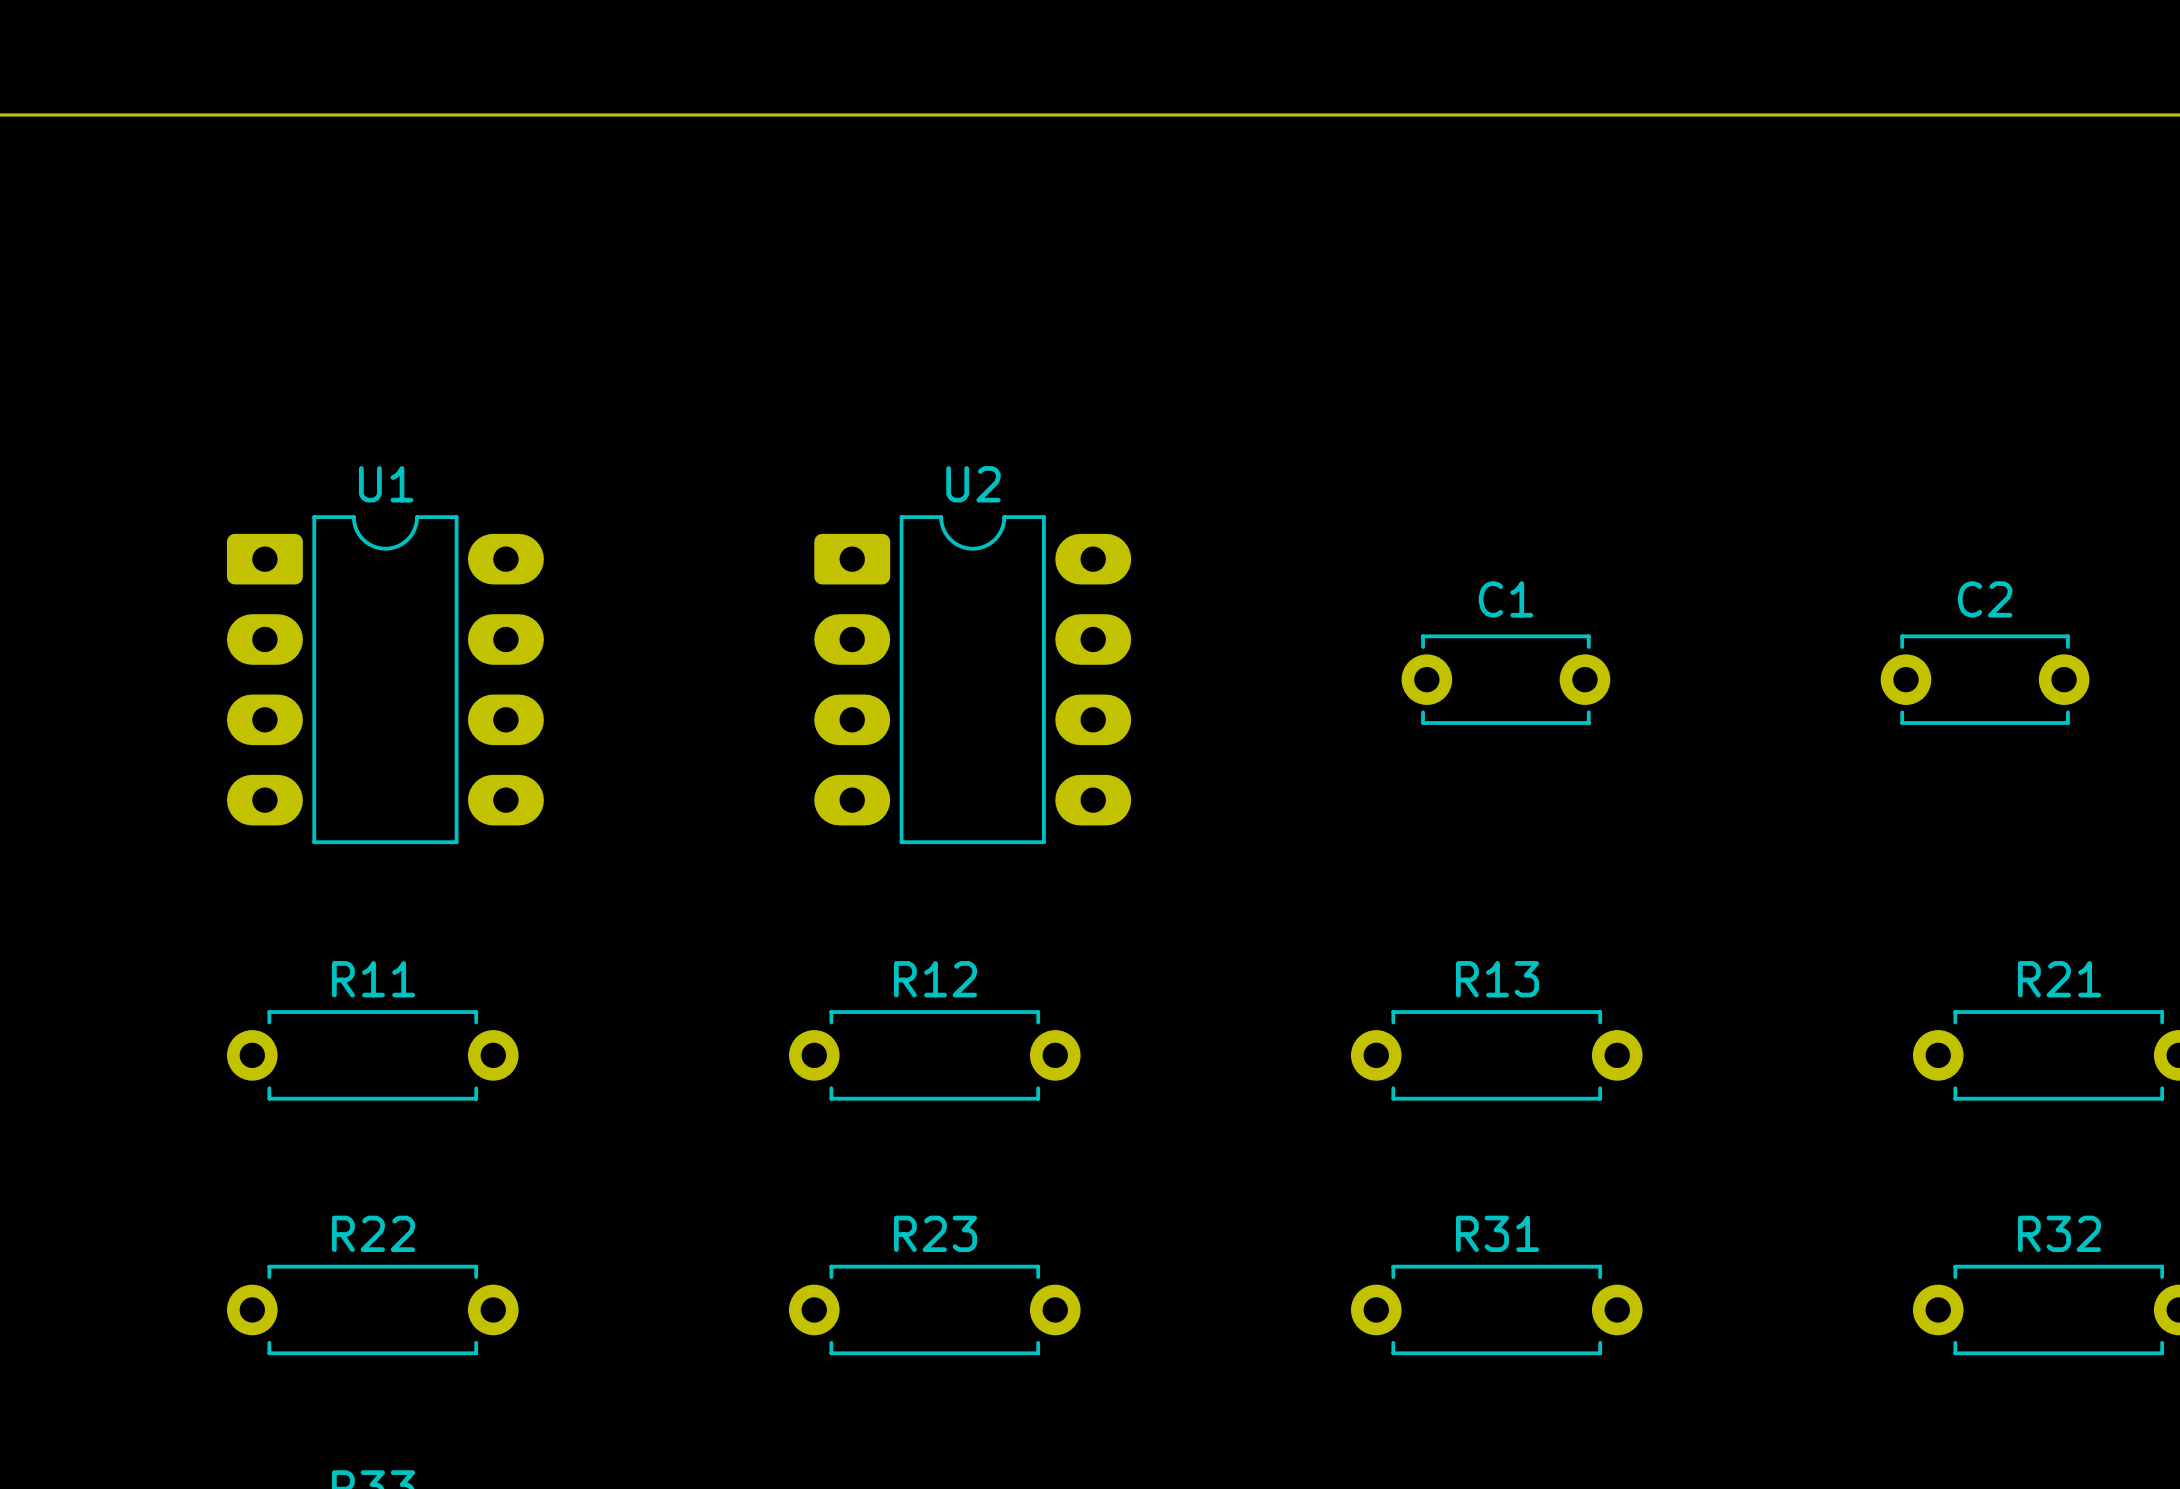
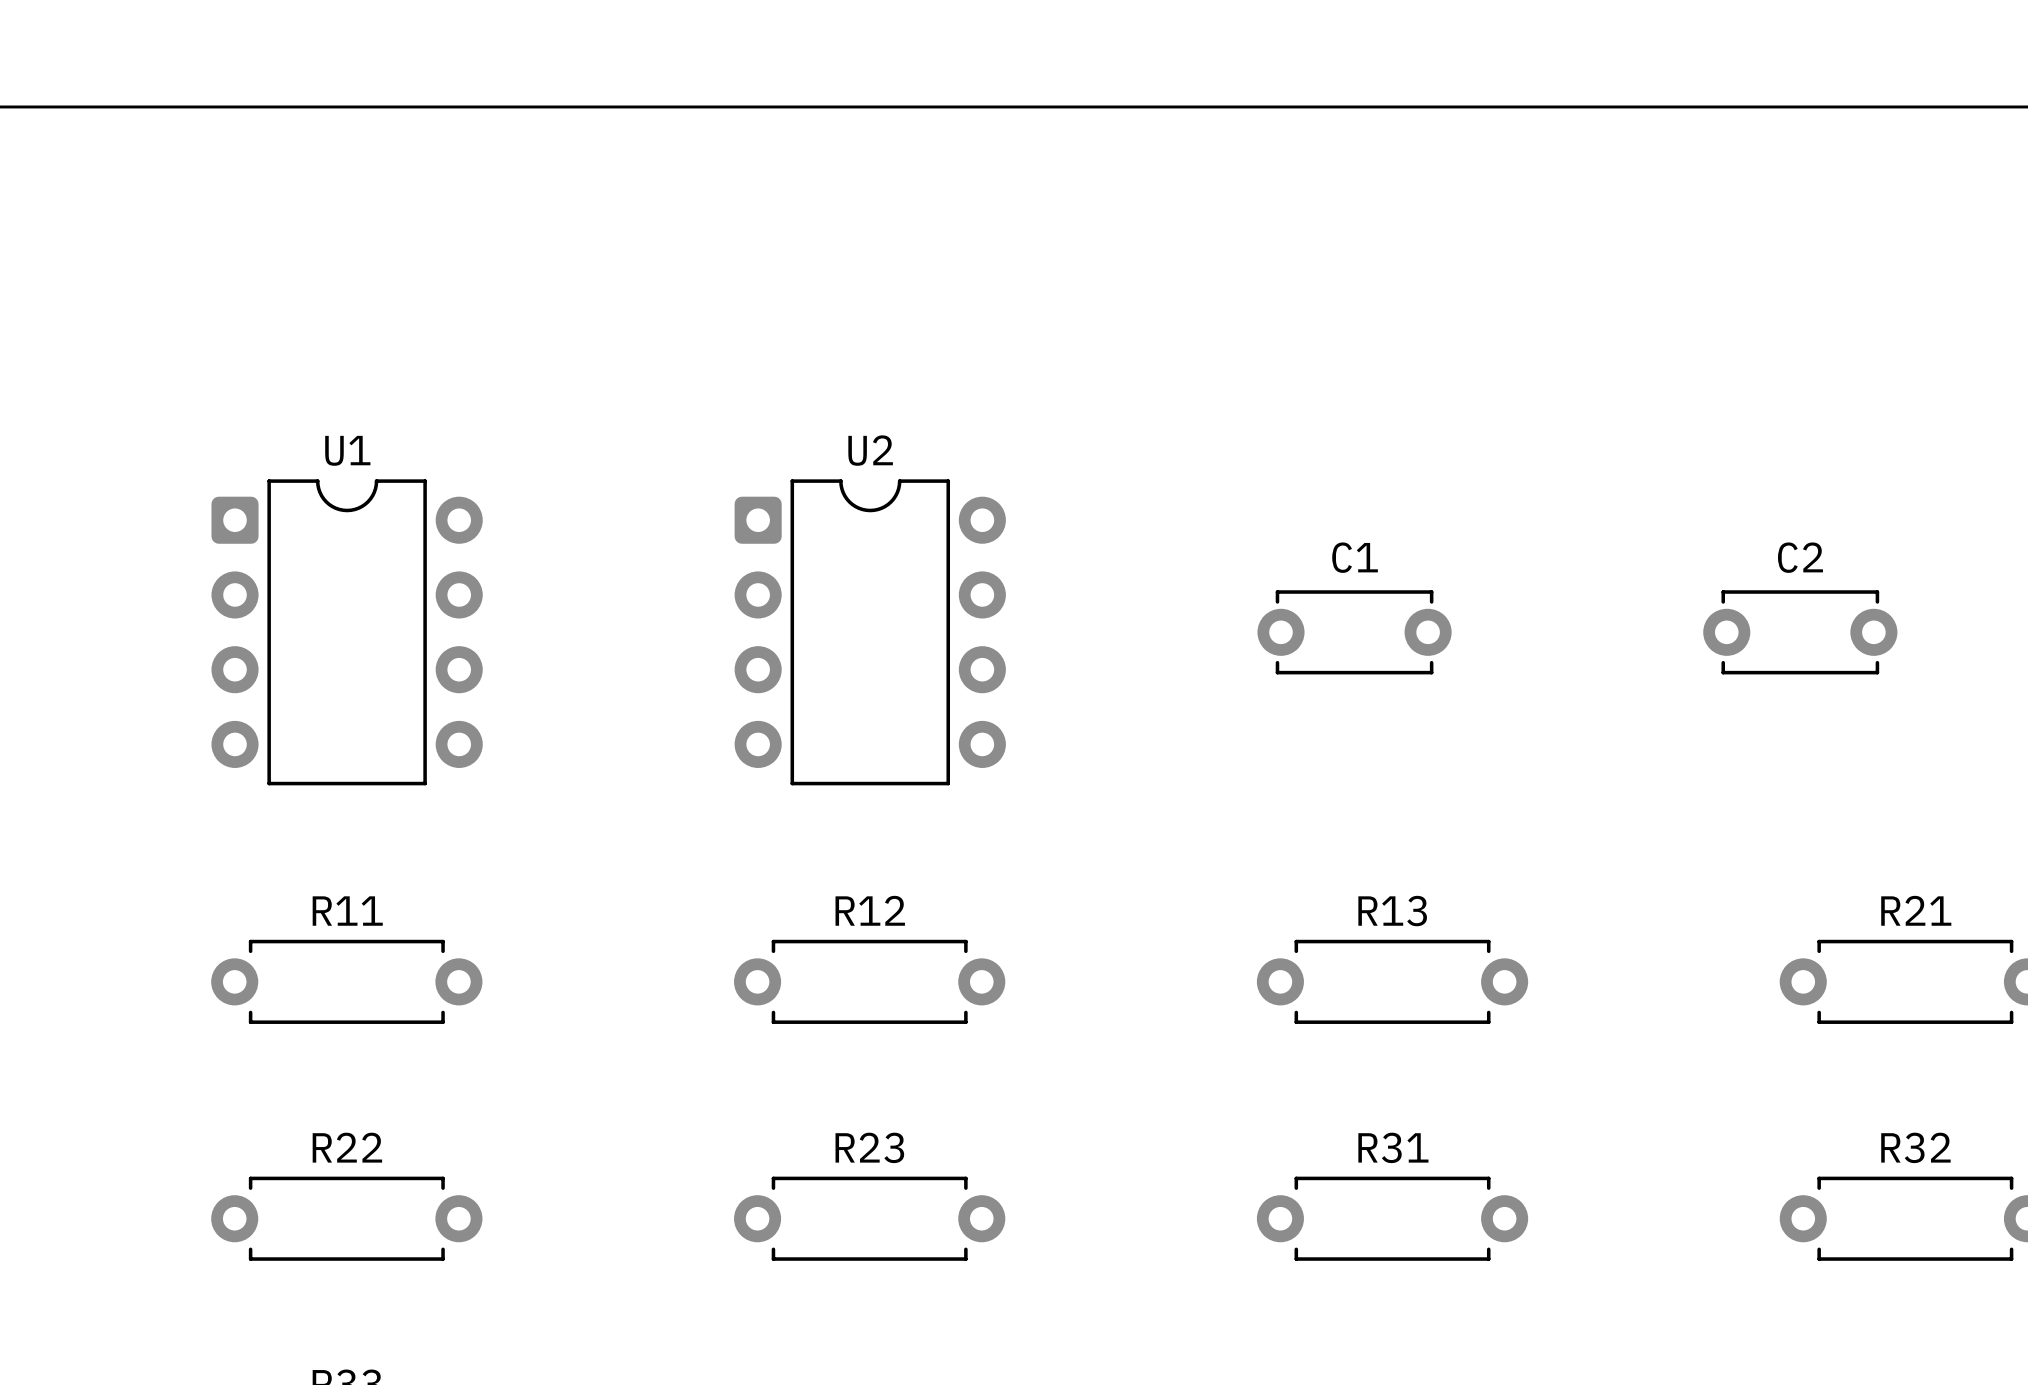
U1 footprint: [226, 515, 544, 845] -> [211, 479, 483, 786]
U2 footprint: [814, 515, 1132, 845] -> [734, 479, 1006, 786]
C1 position: (1505, 679) -> (1354, 632)
C2 position: (1985, 679) -> (1800, 632)

